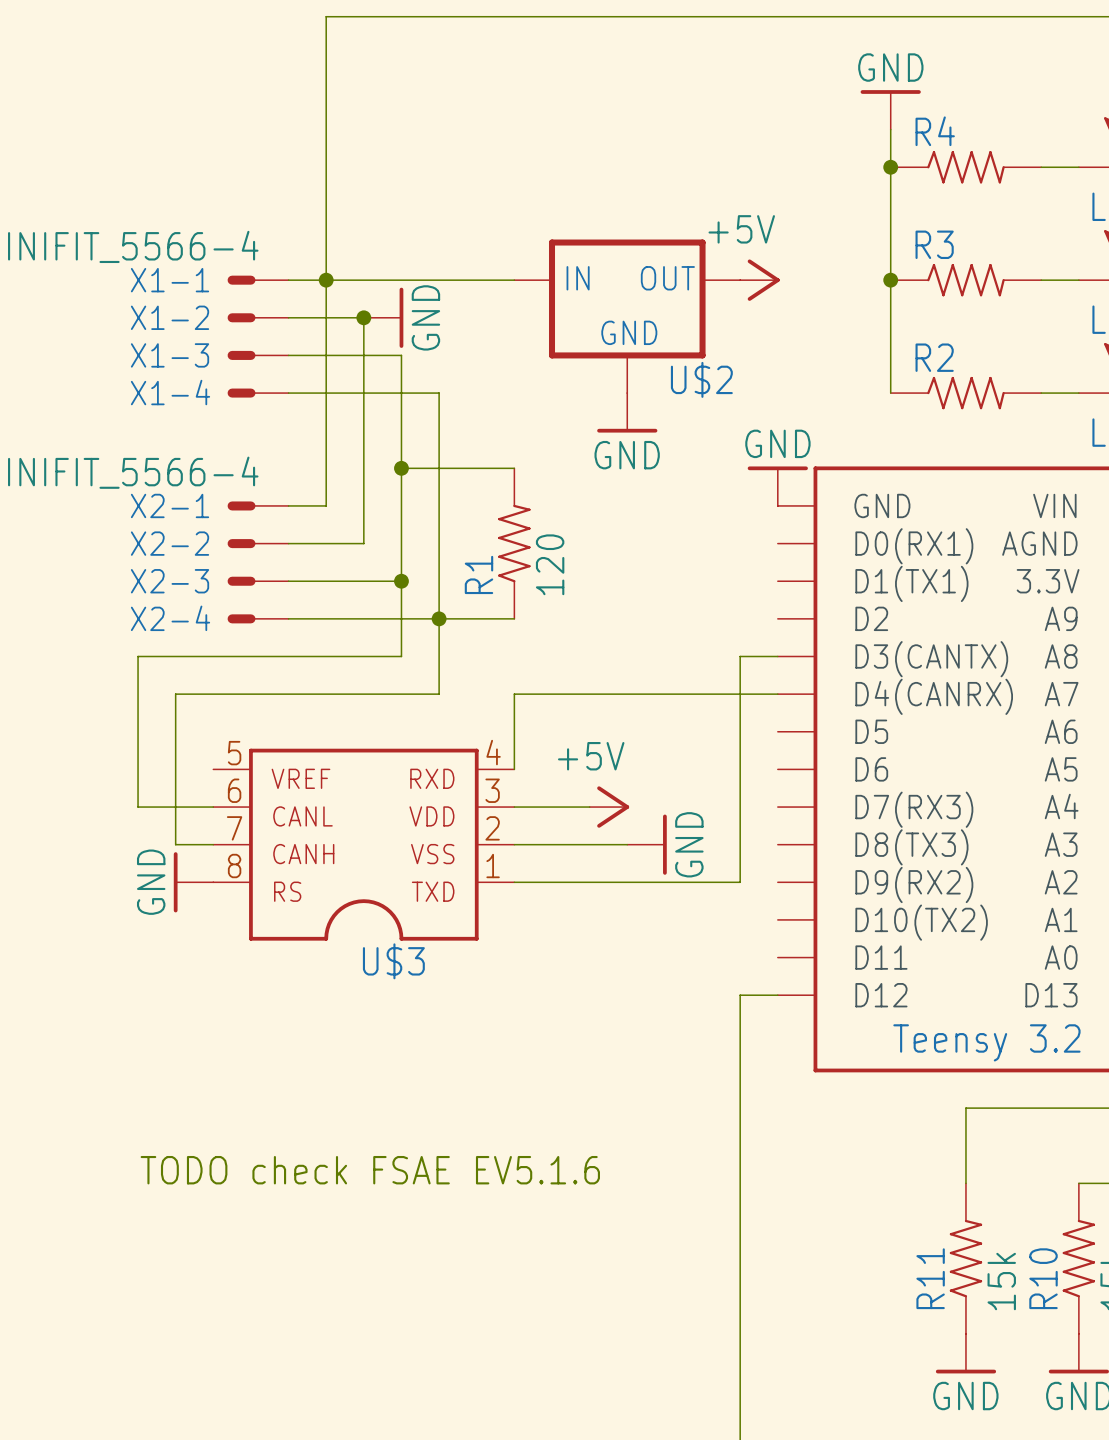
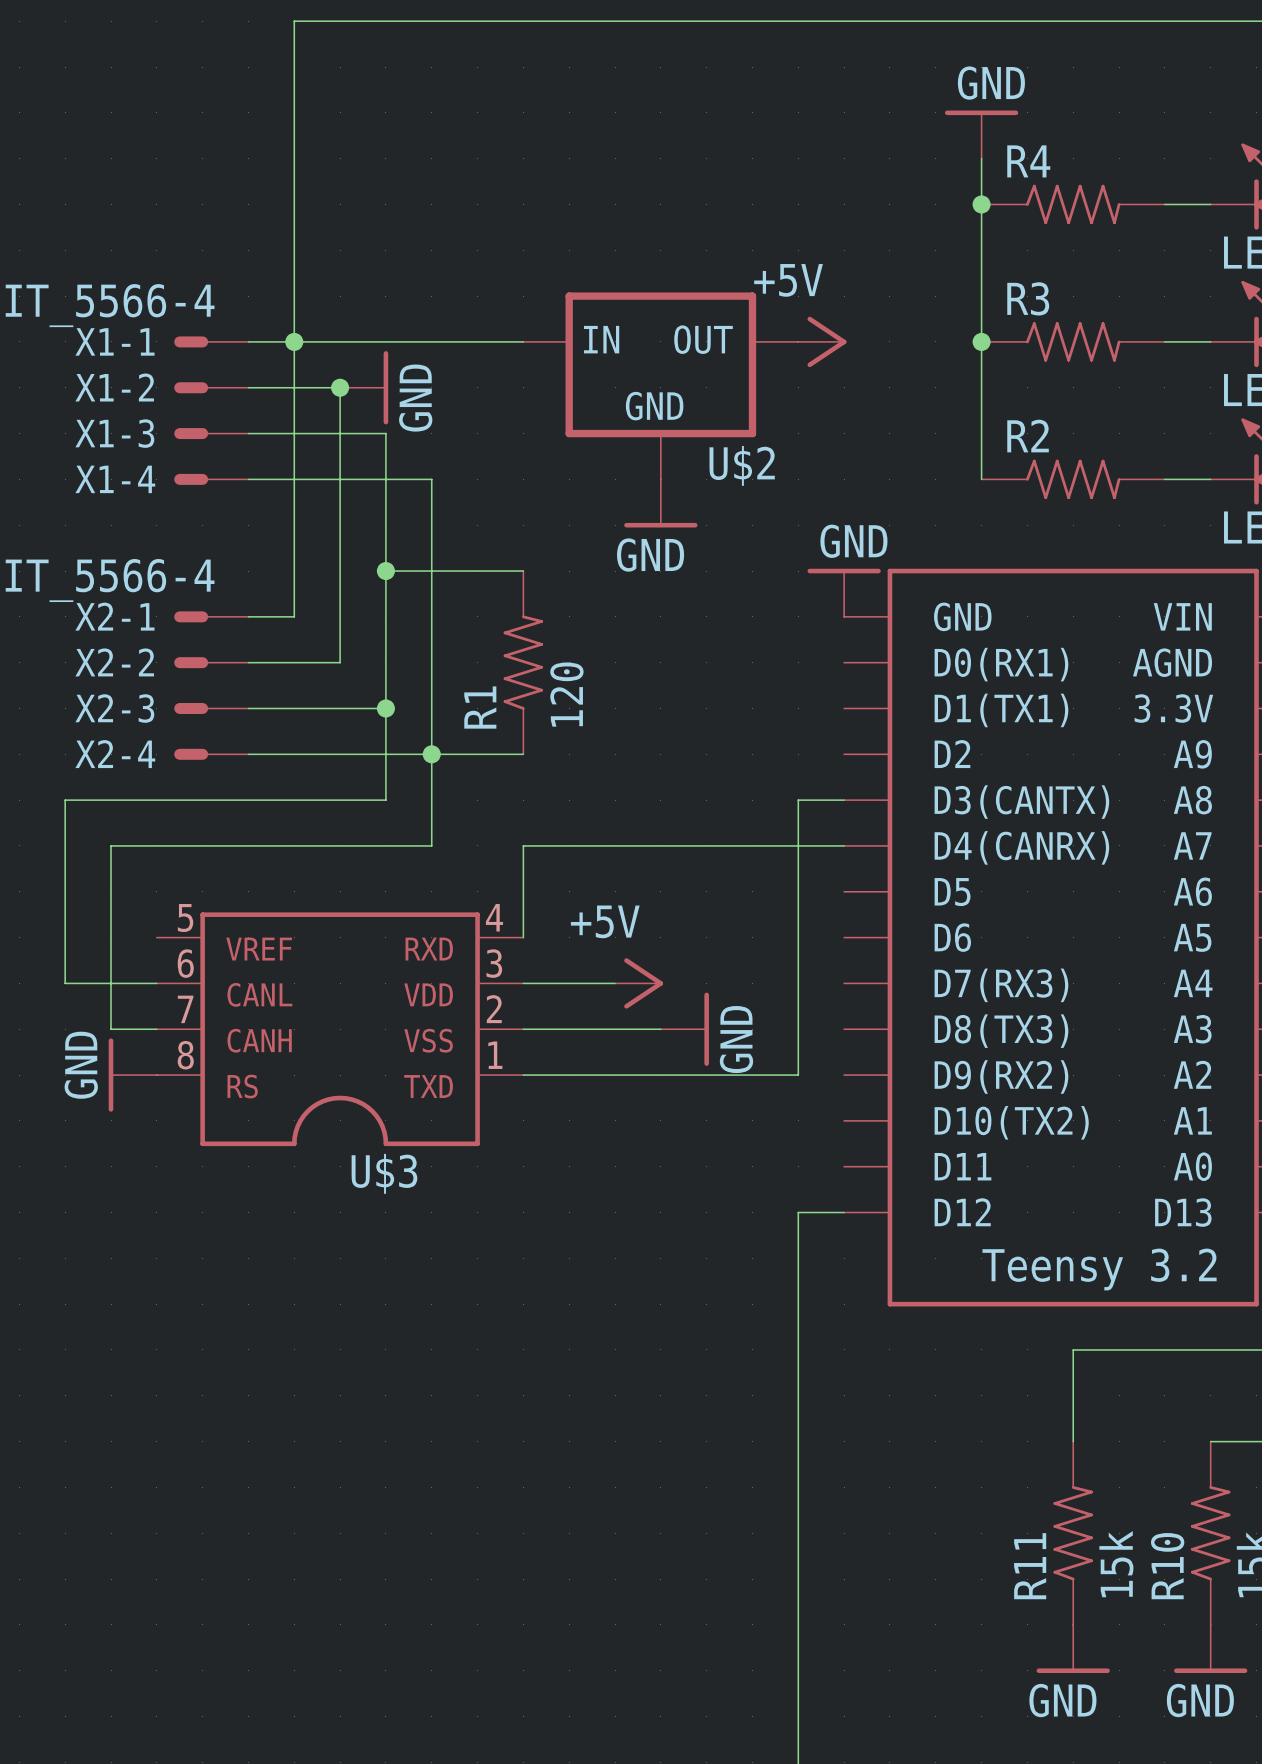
text: TODO check FSAE EV5.1.6 (370, 1170) -> none

